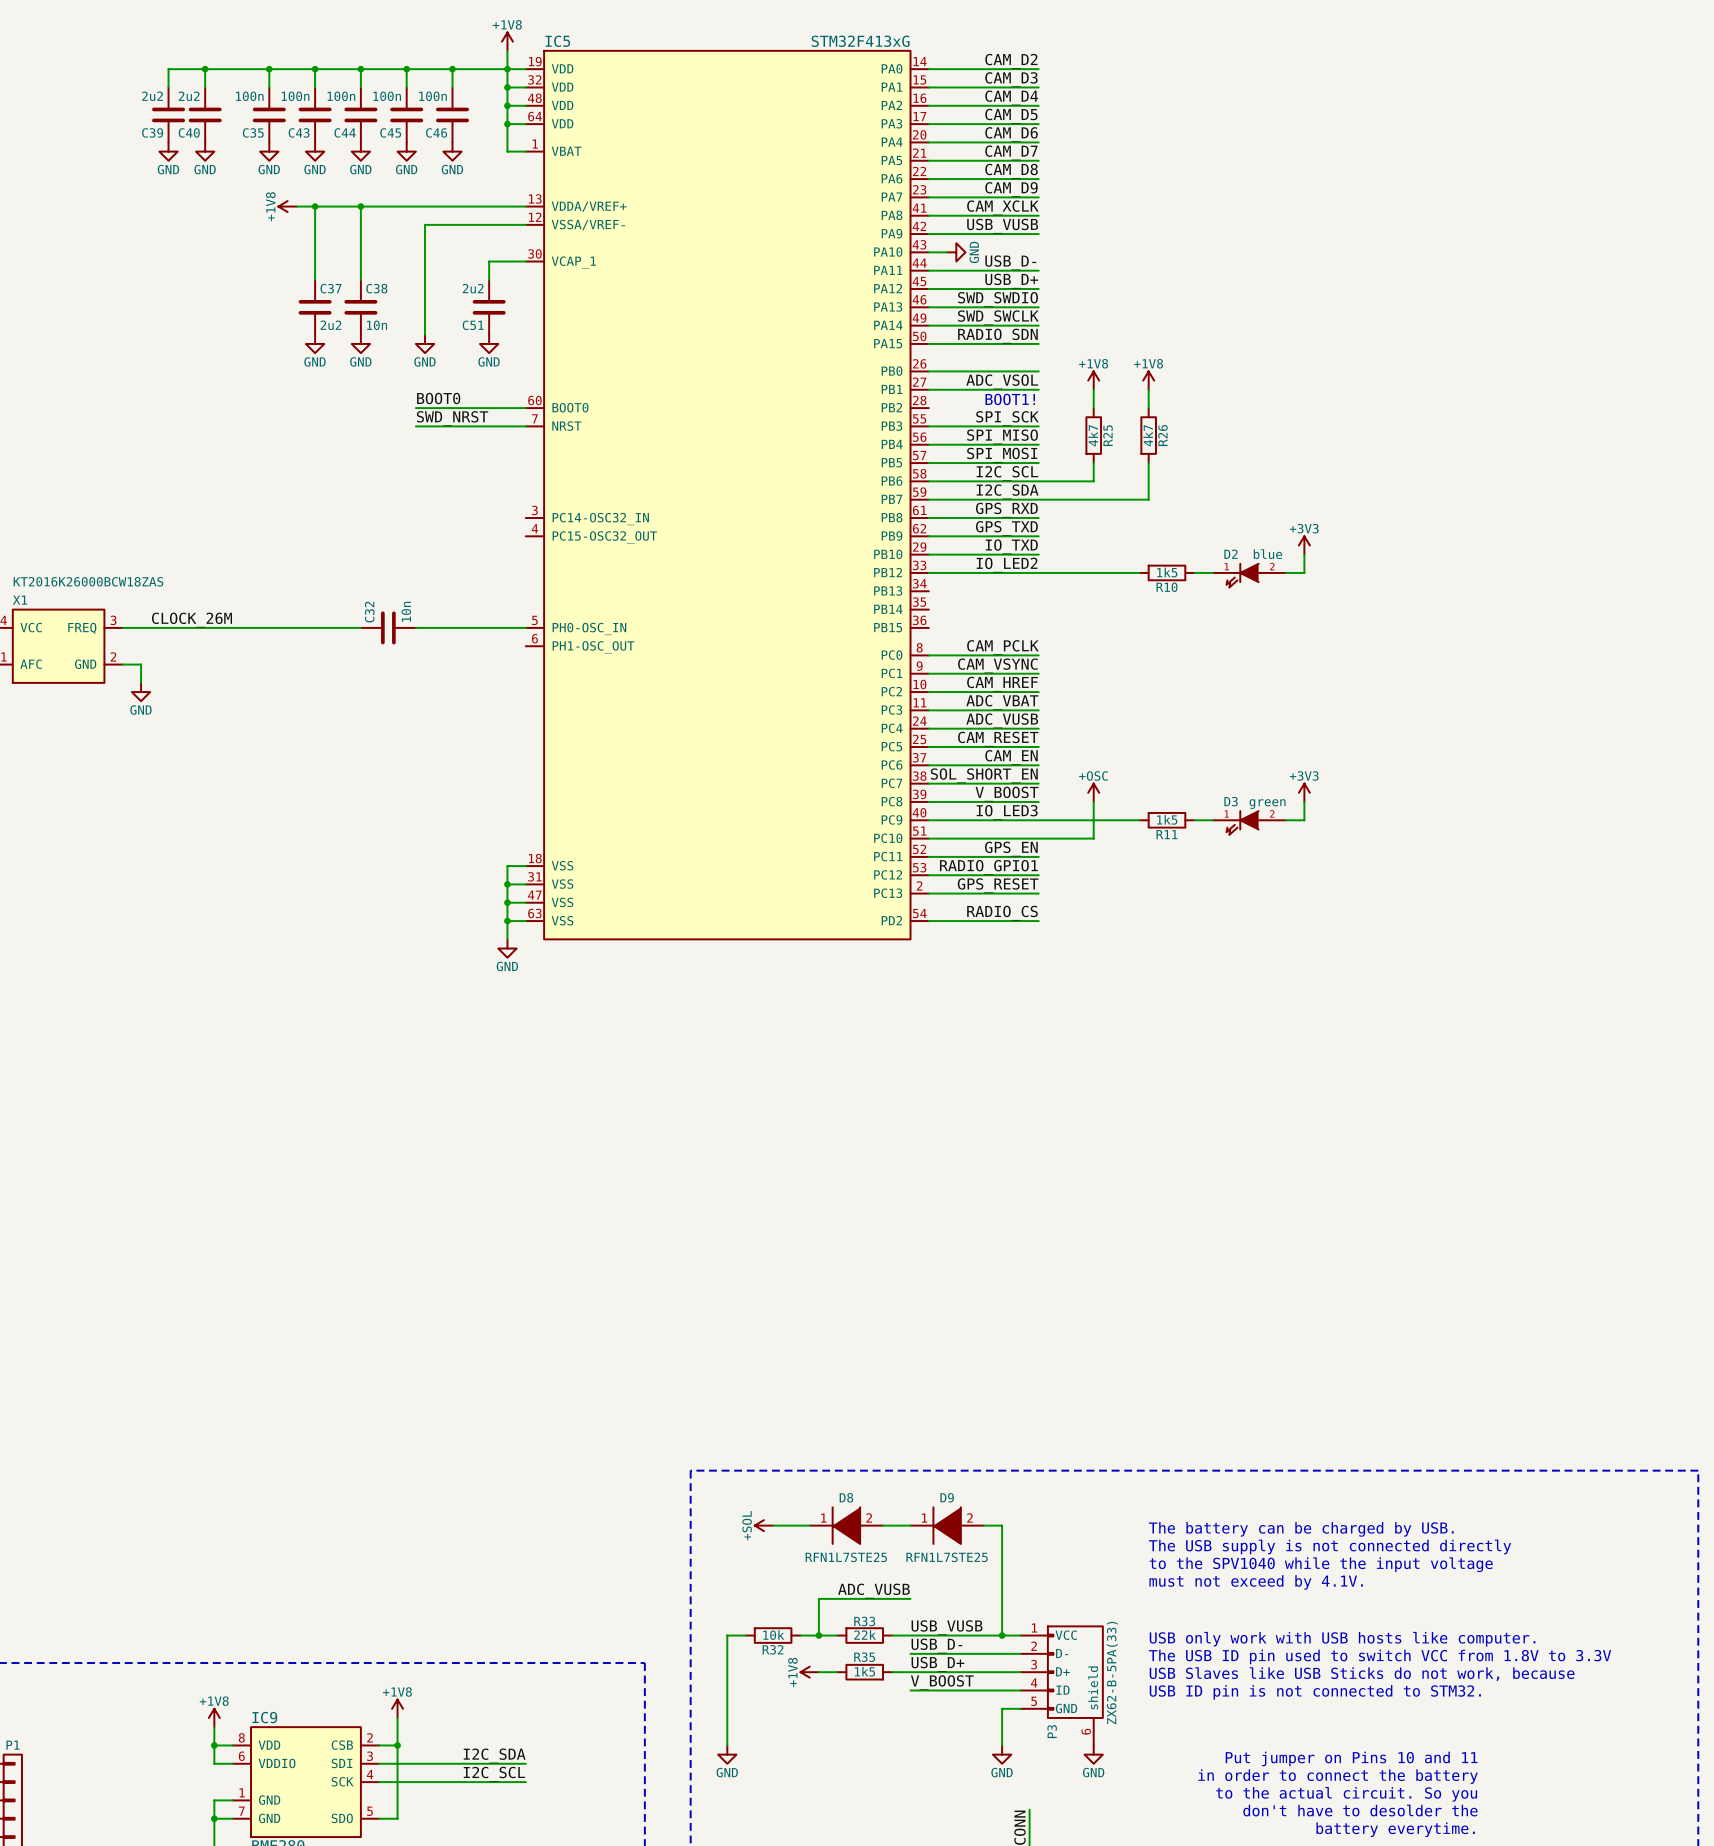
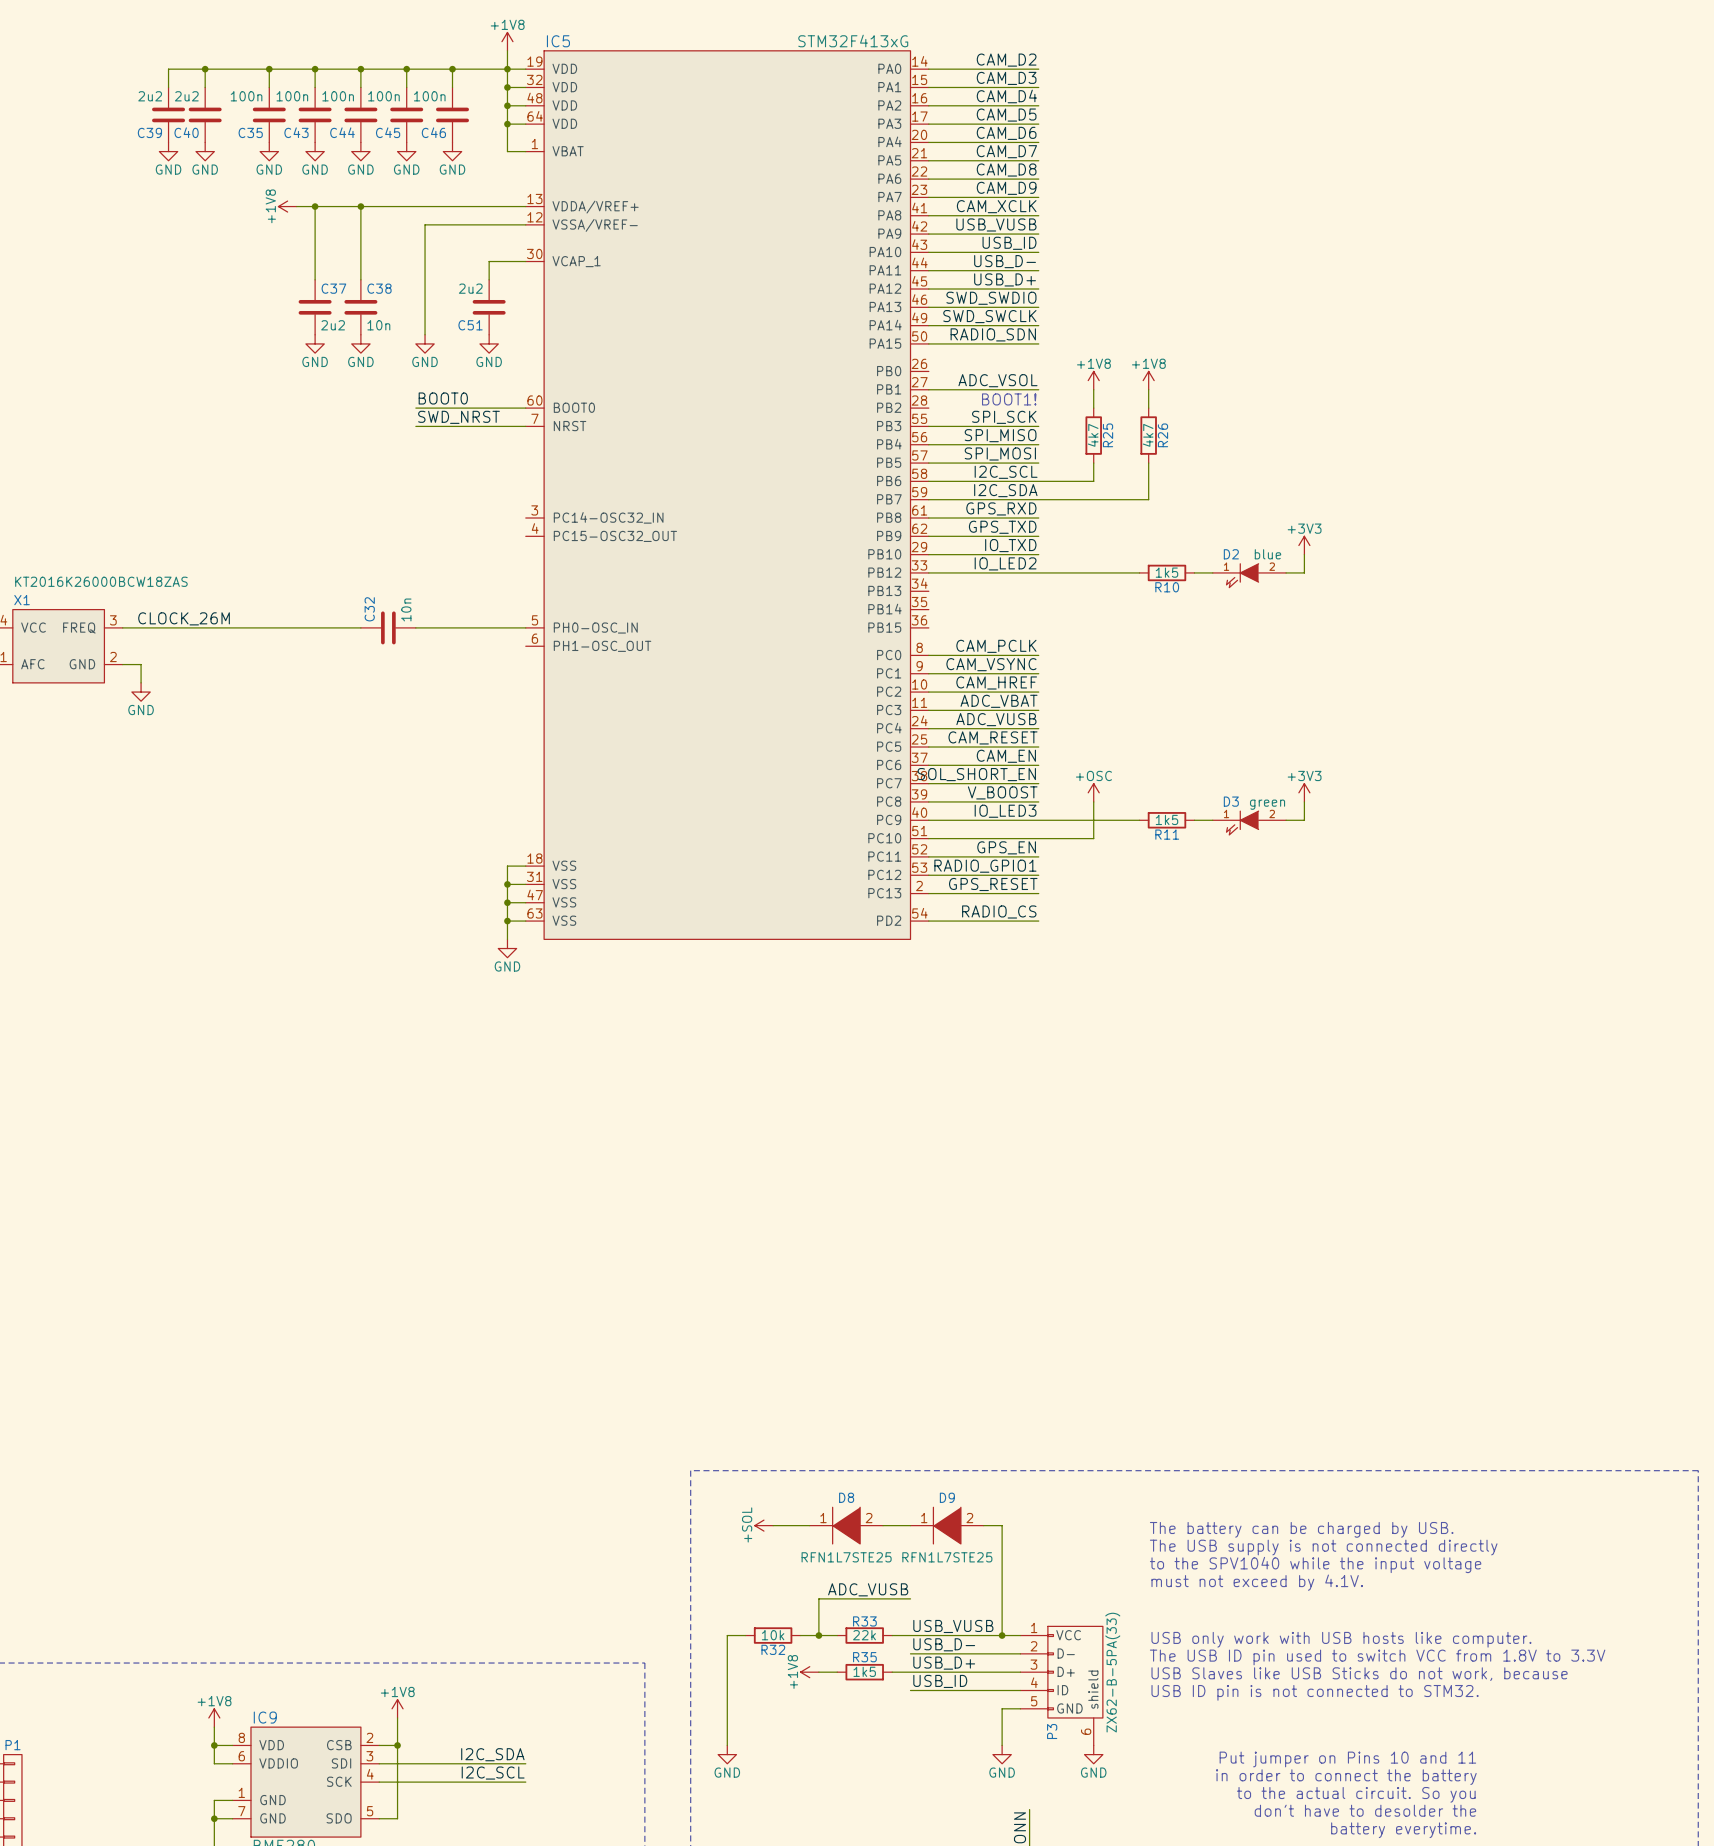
label: none -> USB_ID (1009, 243)
wire: none -> (947, 252) (1038, 252)
power symbol: GND (956, 252) -> none
wire: (928, 371) (1038, 371) -> none
label: V_BOOST (942, 1682) -> USB_ID (940, 1681)

